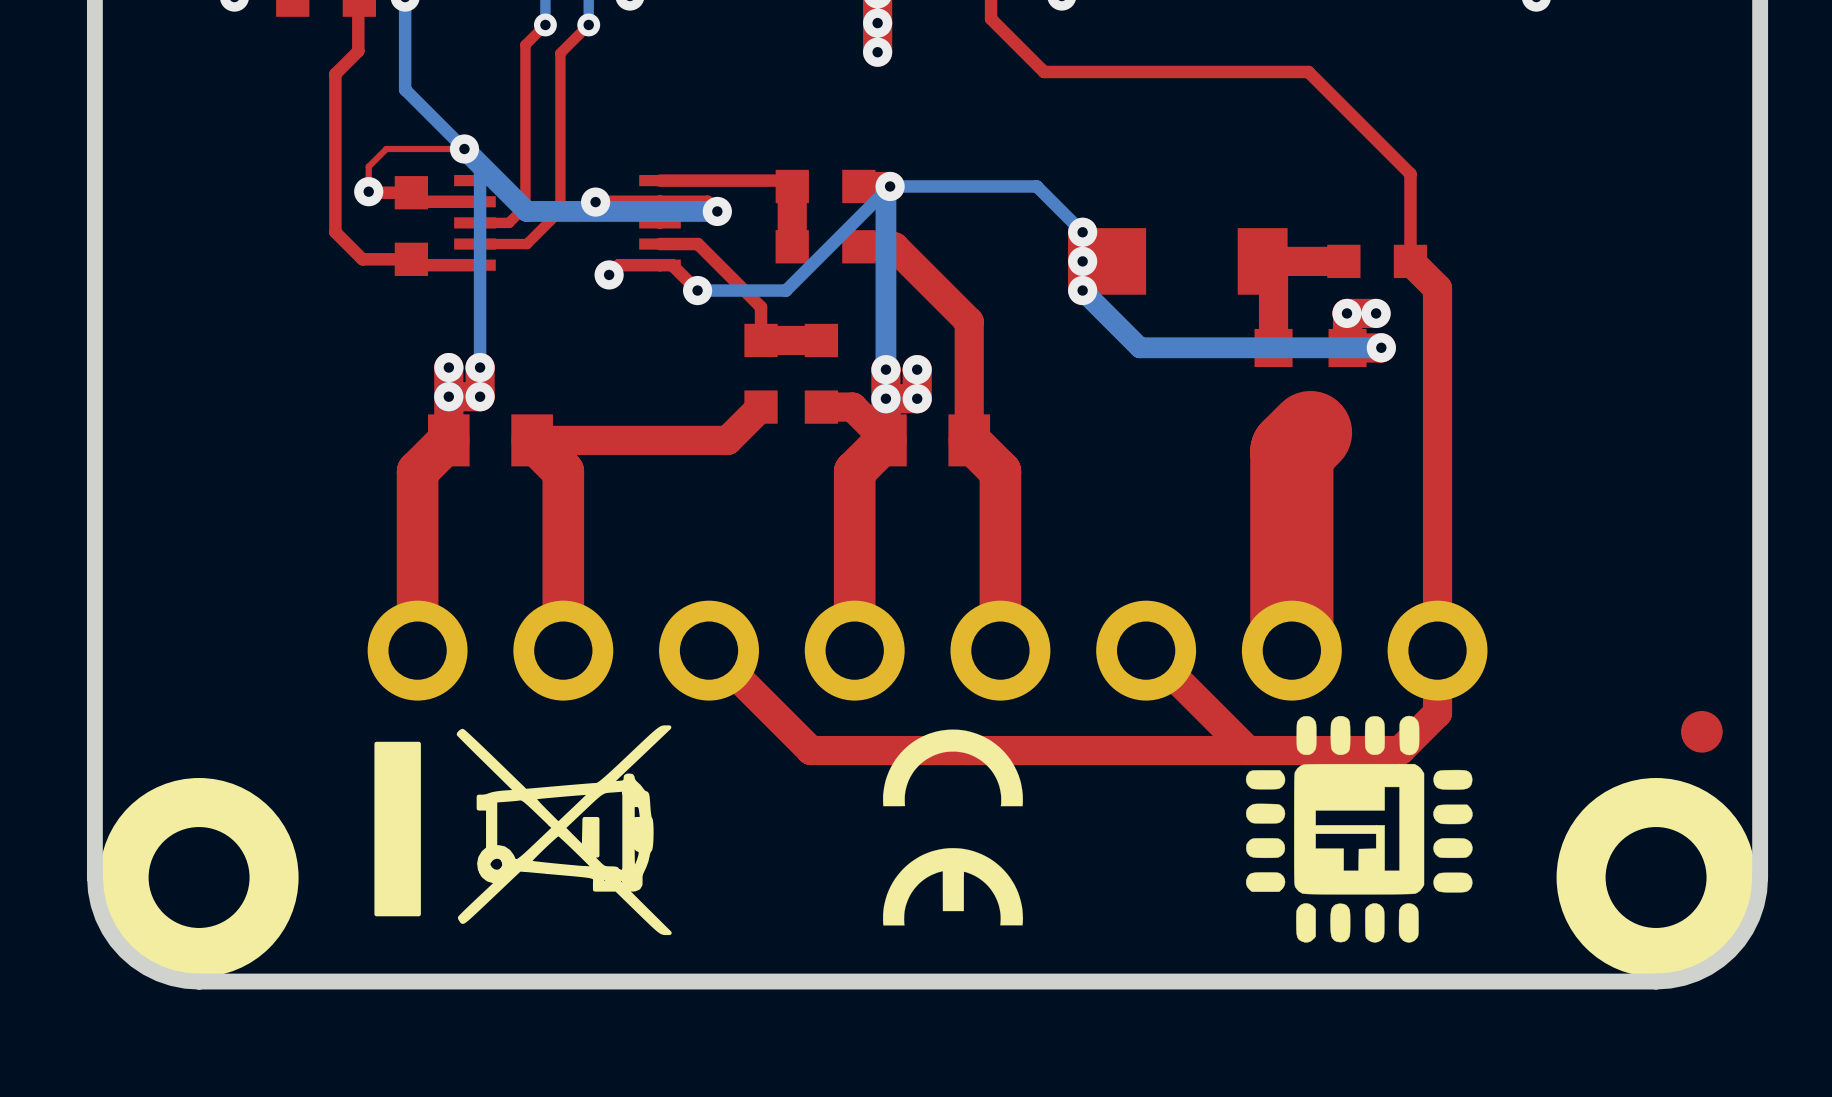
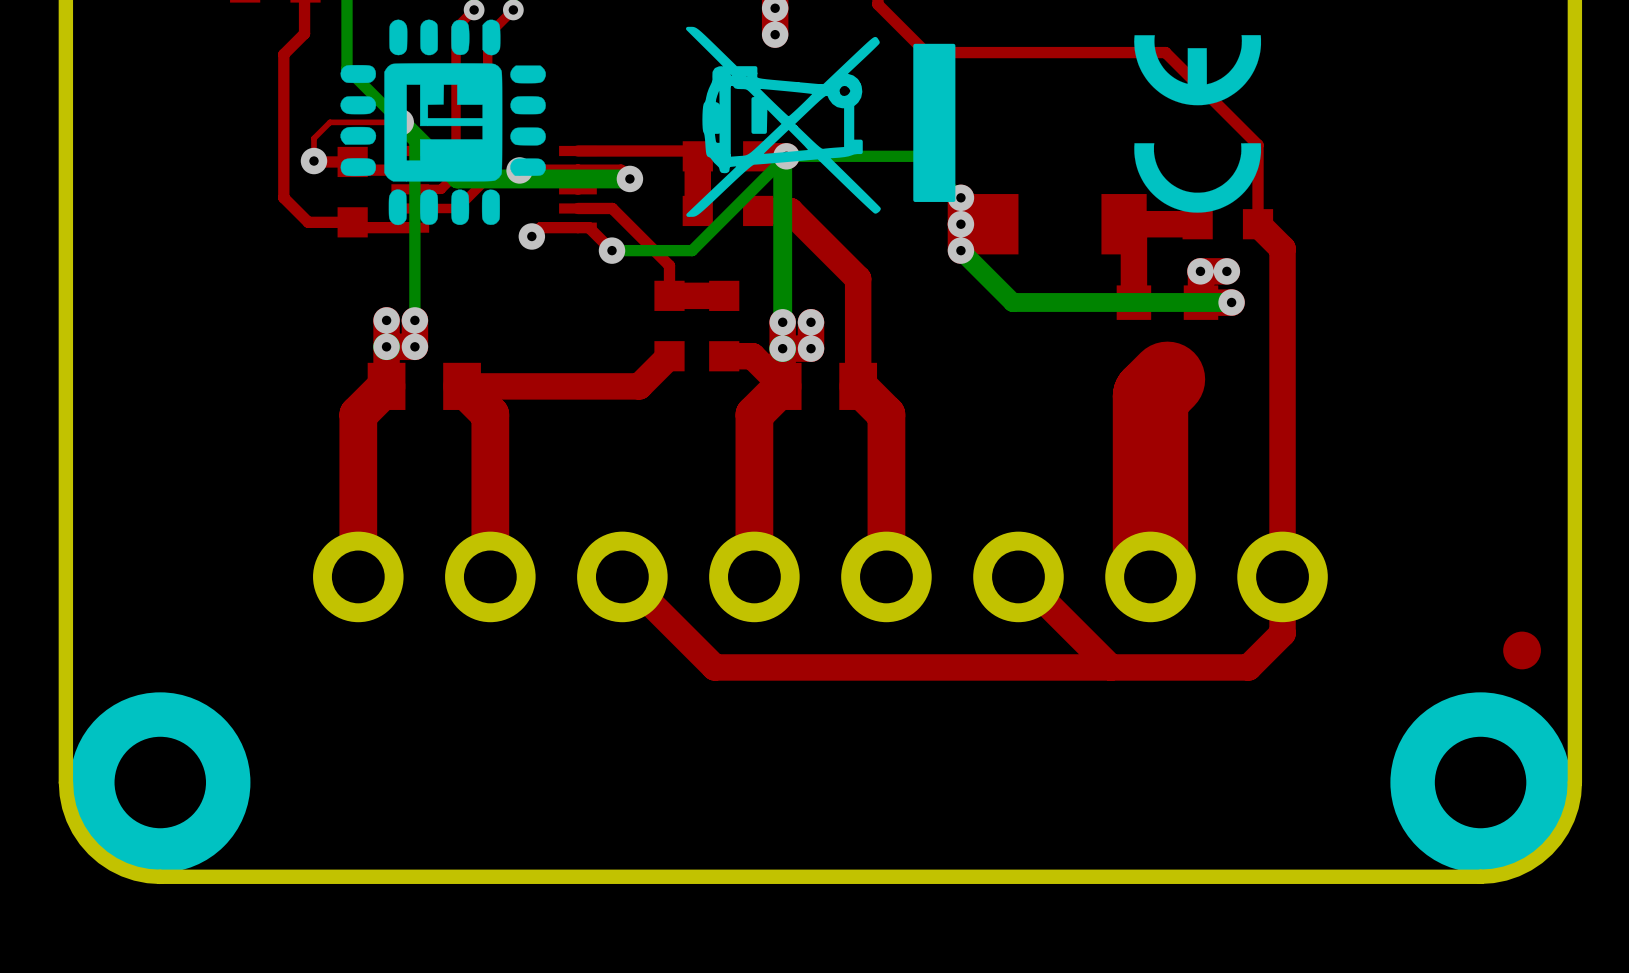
drawing: none -> [340, 19, 546, 226]
drawing: none -> [685, 26, 956, 217]
drawing: none -> [1134, 35, 1262, 213]
drawing: [1245, 715, 1473, 943] -> none
drawing: [374, 725, 672, 936] -> none
drawing: [883, 729, 1024, 926] -> none

